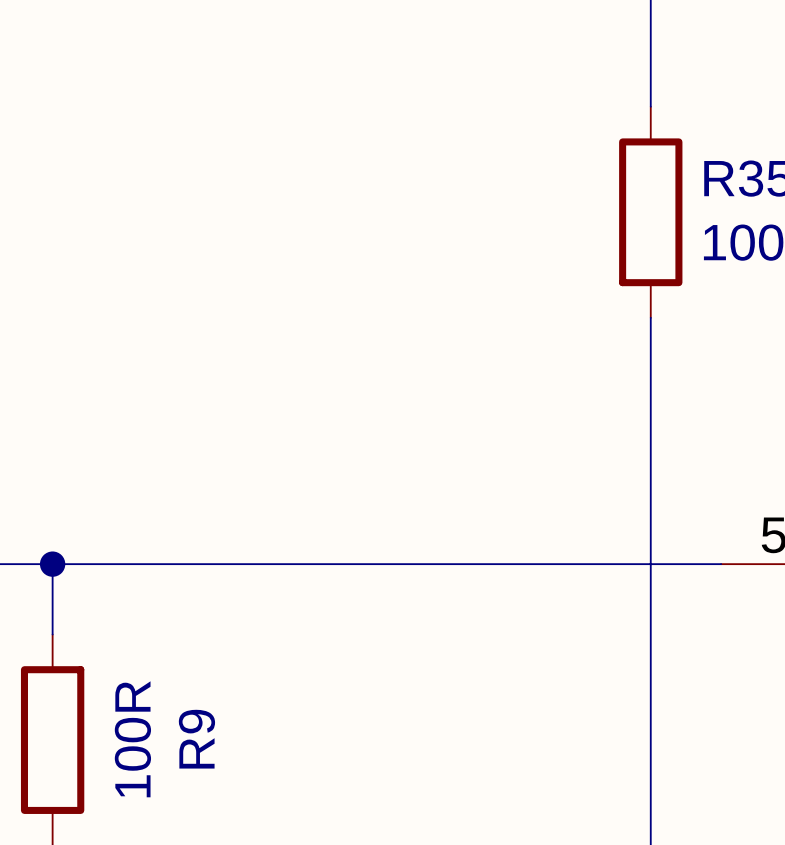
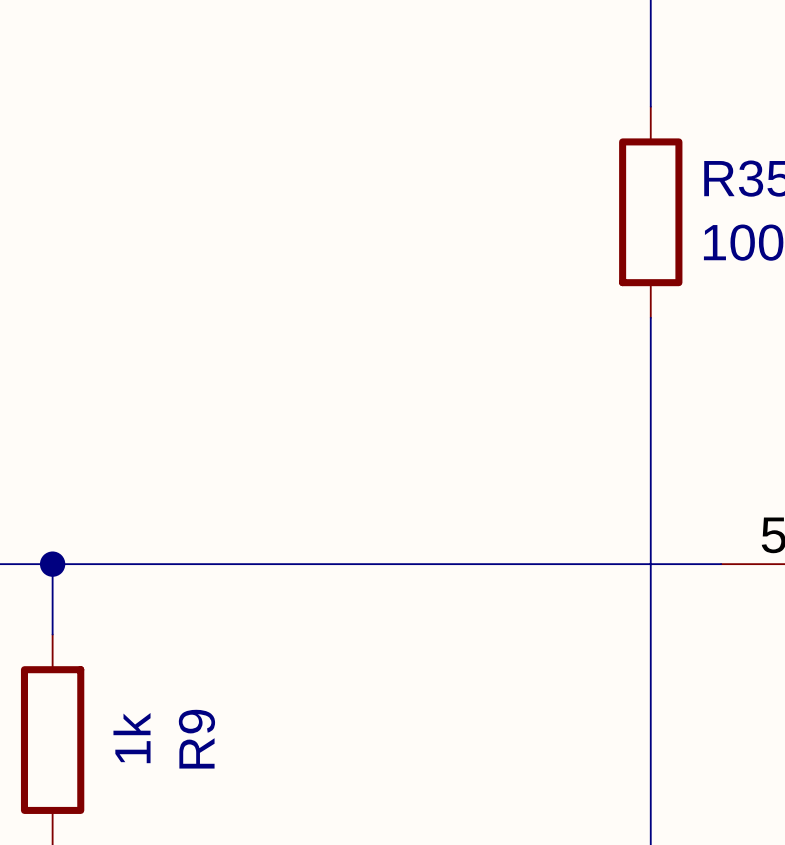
R9 value: 100R (132, 739) -> 1k (131, 738)

